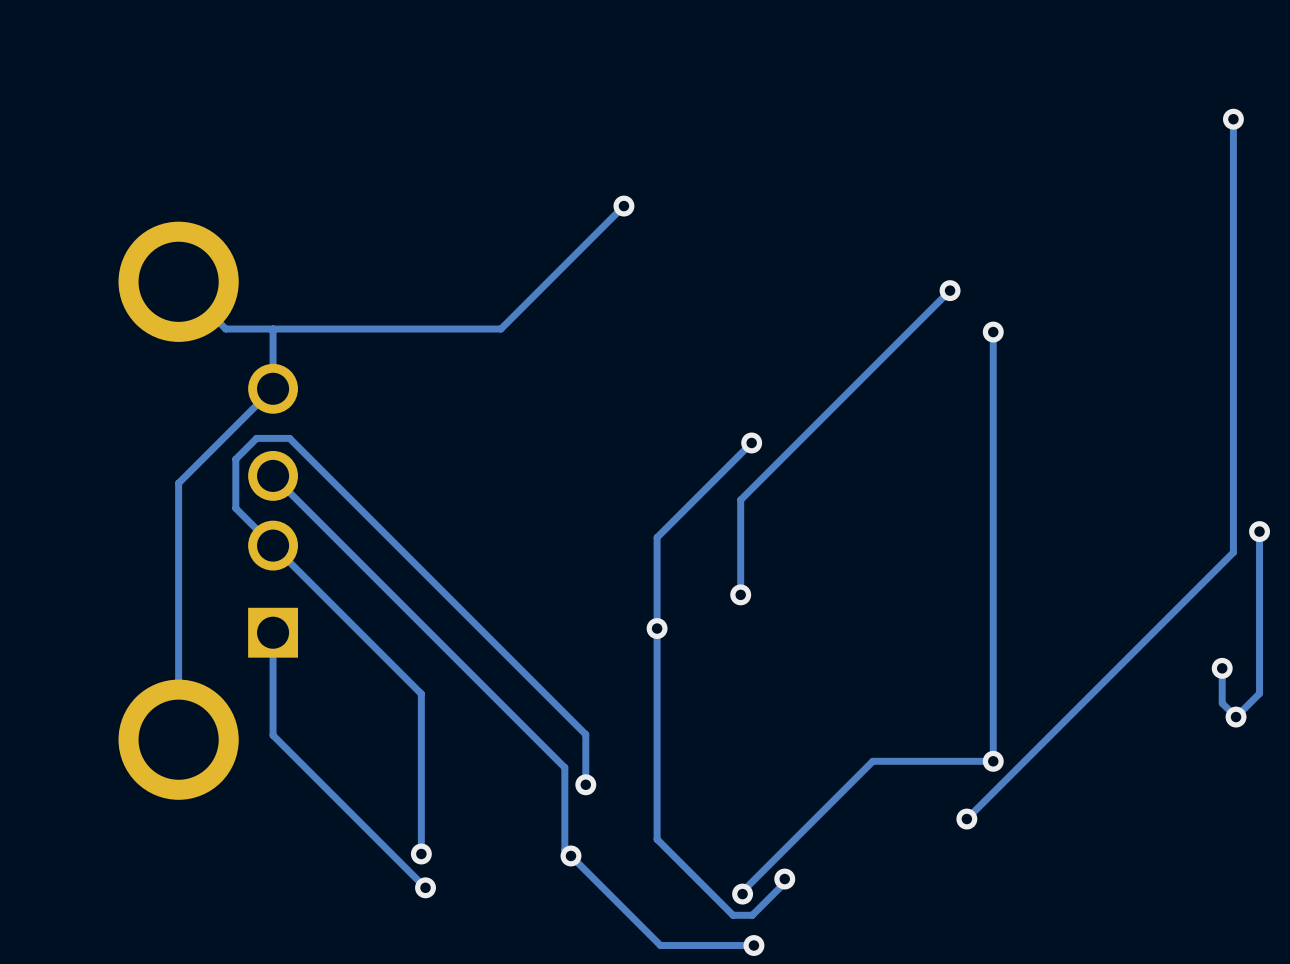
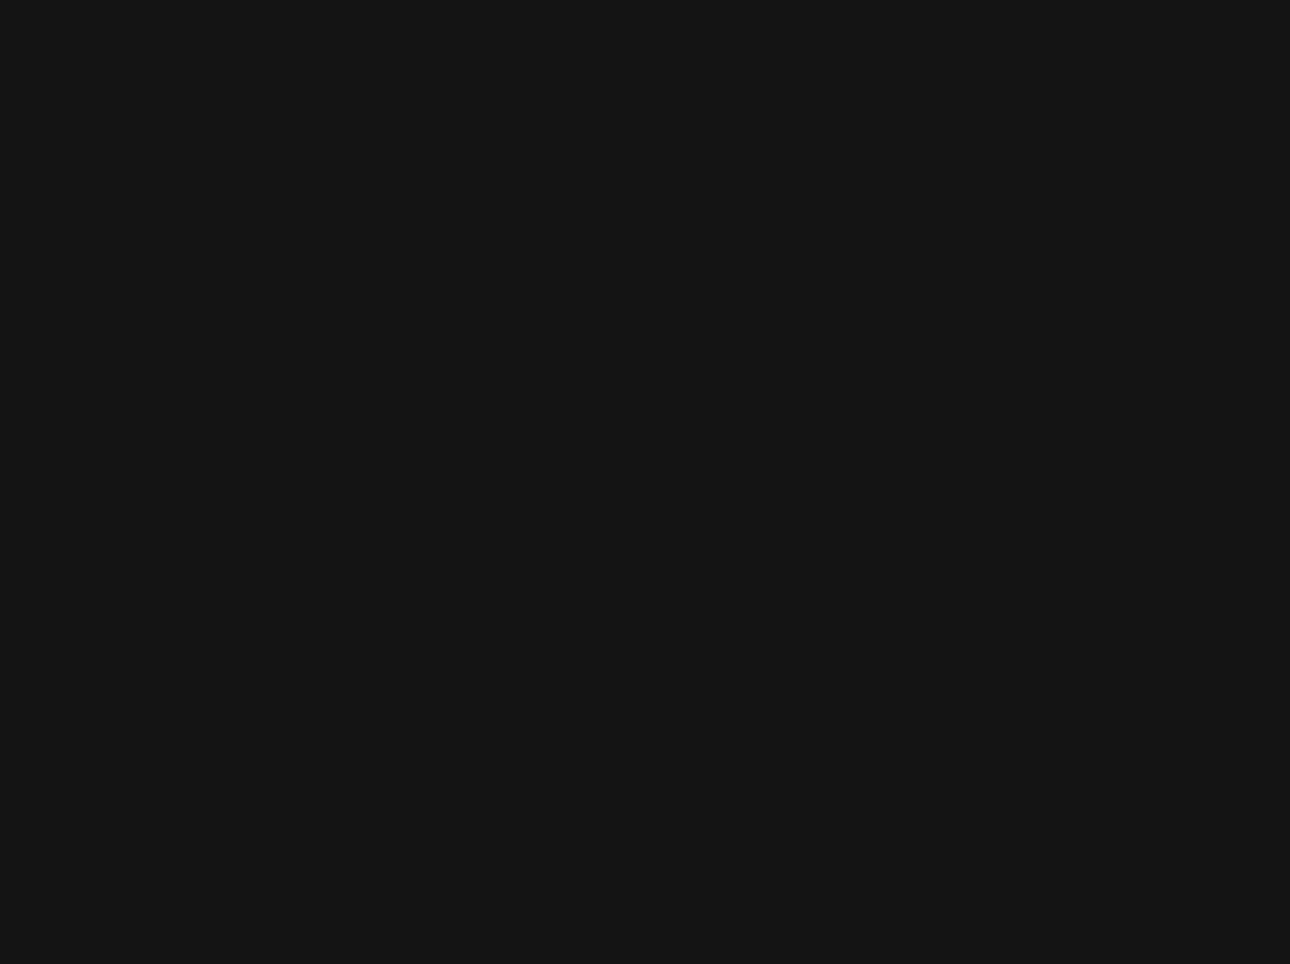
track: (1233, 119) (1233, 552) (966, 819) -> none
via: (1233, 119) -> none
track: (623, 206) (500, 329) (225, 329) (178, 281) -> none
via: (623, 206) -> none
track: (950, 290) (740, 499) (740, 594) -> none
via: (950, 290) -> none
track: (273, 329) (273, 388) (178, 483) (178, 739) -> none
track: (993, 332) (993, 761) (872, 761) (742, 891) (742, 894) -> none
via: (993, 332) -> none
track: (751, 442) (657, 537) (657, 839) (733, 915) (752, 915) (784, 882) (784, 879) -> none
via: (751, 442) -> none
track: (273, 475) (564, 767) (564, 849) (660, 945) (753, 945) -> none
part: (208, 510) -> none
track: (1259, 531) (1259, 693) (1236, 717) (1222, 703) (1222, 668) -> none
via: (1259, 531) -> none
via: (740, 594) -> none
via: (657, 628) -> none
track: (273, 632) (273, 735) (425, 887) -> none
via: (1222, 668) -> none
via: (1236, 717) -> none
via: (993, 761) -> none
track: (585, 784) (585, 734) (289, 438) (256, 438) (235, 459) (235, 508) (421, 693) (421, 853) -> none
via: (585, 784) -> none
via: (966, 819) -> none
via: (421, 854) -> none
via: (570, 855) -> none
via: (784, 879) -> none
via: (425, 887) -> none
via: (742, 894) -> none
via: (753, 945) -> none

